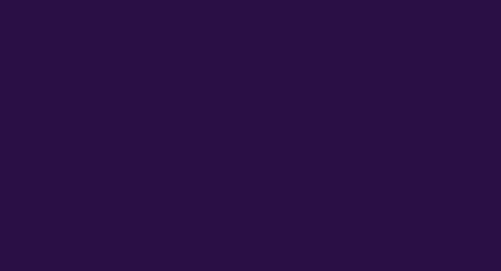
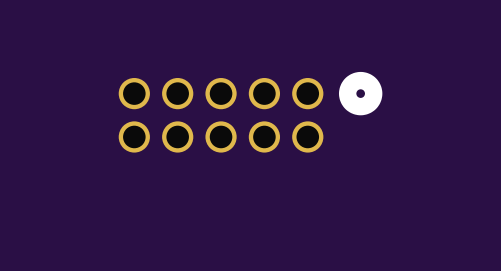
part: none -> (250, 112)

